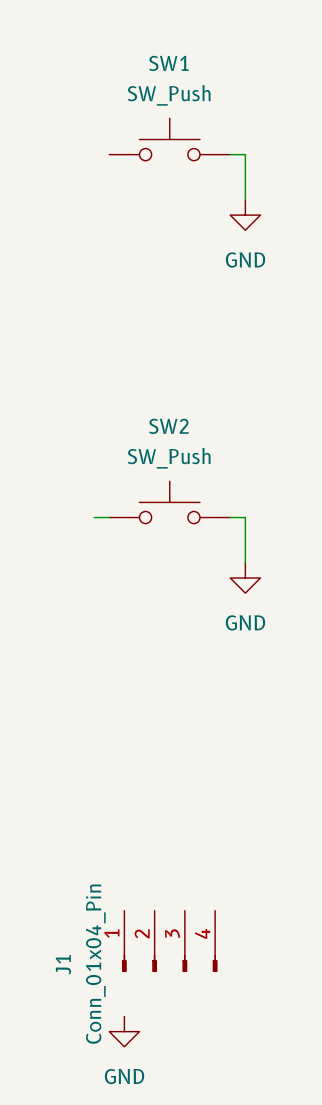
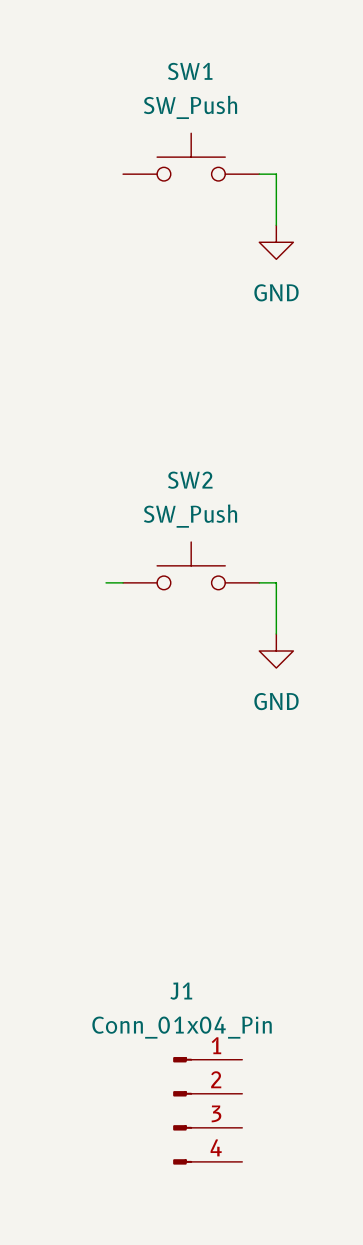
J1 rotation: 0° (169, 963) -> 90° clockwise (182, 1110)
power symbol: GND (124, 1031) -> none

